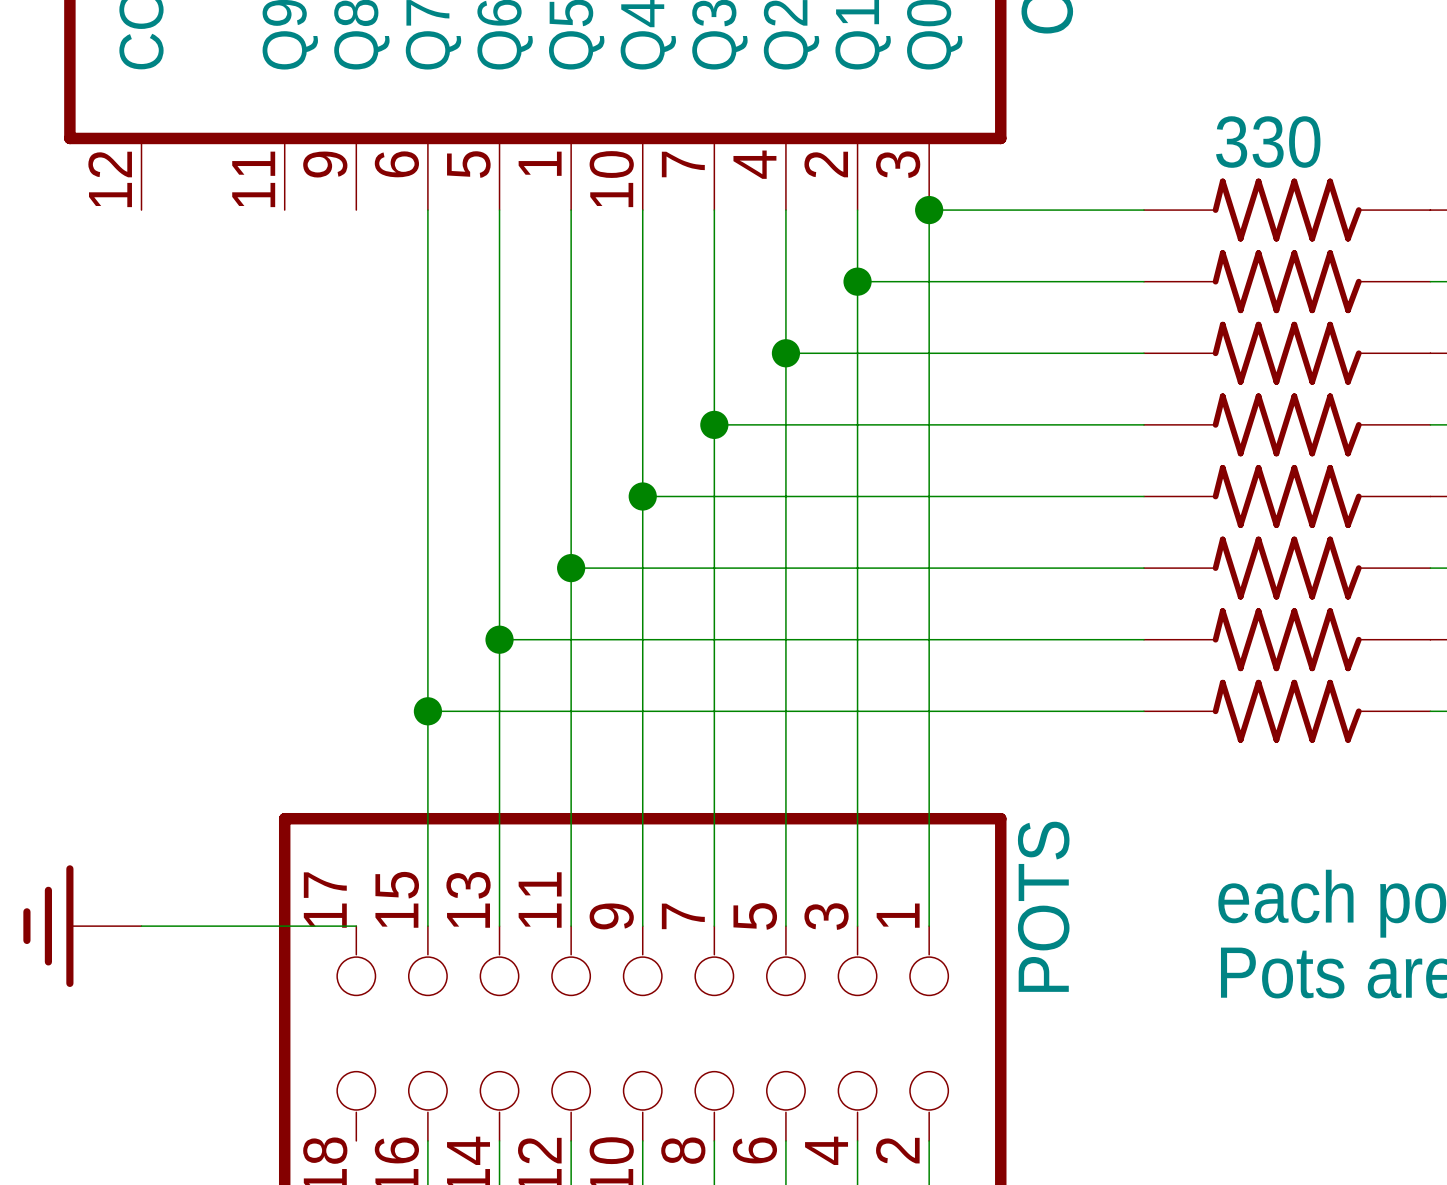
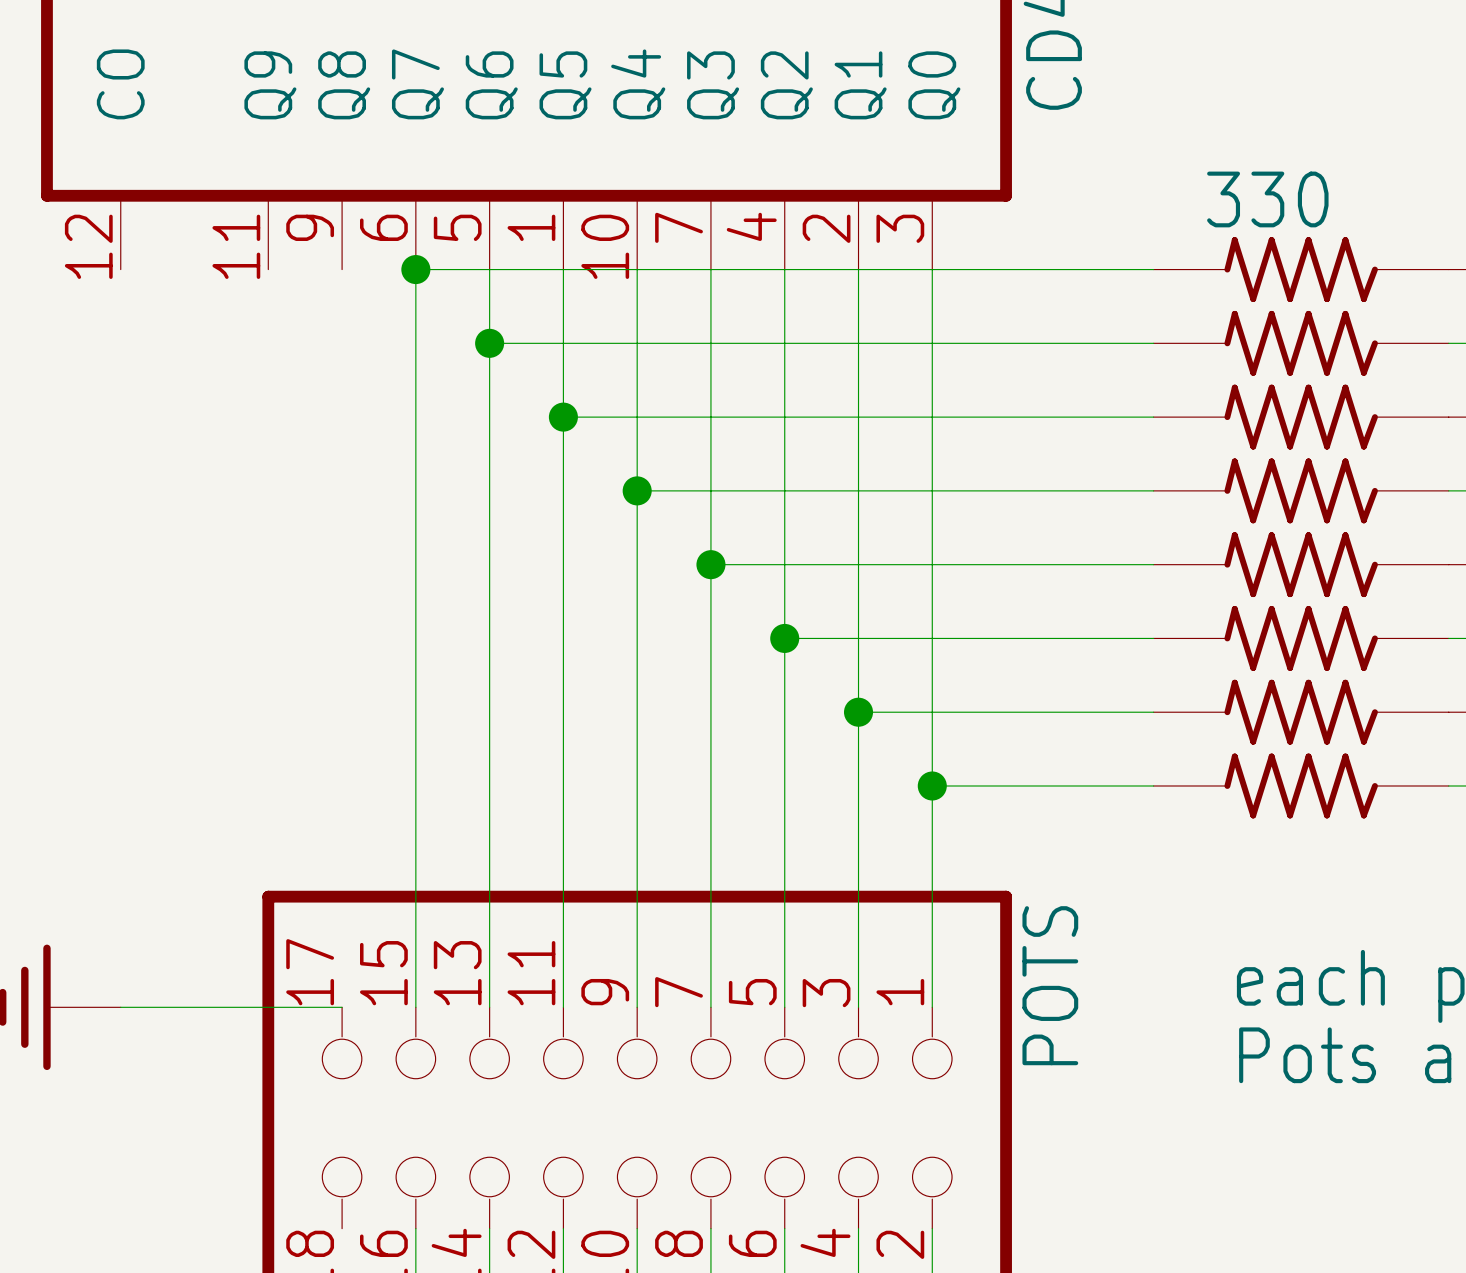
junction: none -> (415, 269)
junction: (929, 210) -> none
junction: none -> (489, 343)
junction: (857, 281) -> none
junction: none -> (563, 417)
junction: (785, 353) -> none
junction: none -> (637, 490)
junction: (714, 424) -> none
wire: (642, 496) (714, 496) -> (637, 490) (710, 490)
junction: (642, 496) -> none
junction: none -> (710, 564)
wire: (571, 568) (785, 568) -> (563, 417) (784, 417)
junction: (571, 568) -> none
junction: none -> (784, 638)
wire: (499, 639) (857, 639) -> (489, 343) (858, 343)
junction: (499, 639) -> none
junction: none -> (858, 712)
wire: (427, 711) (929, 711) -> (415, 269) (932, 269)
junction: (427, 711) -> none
junction: none -> (932, 785)

